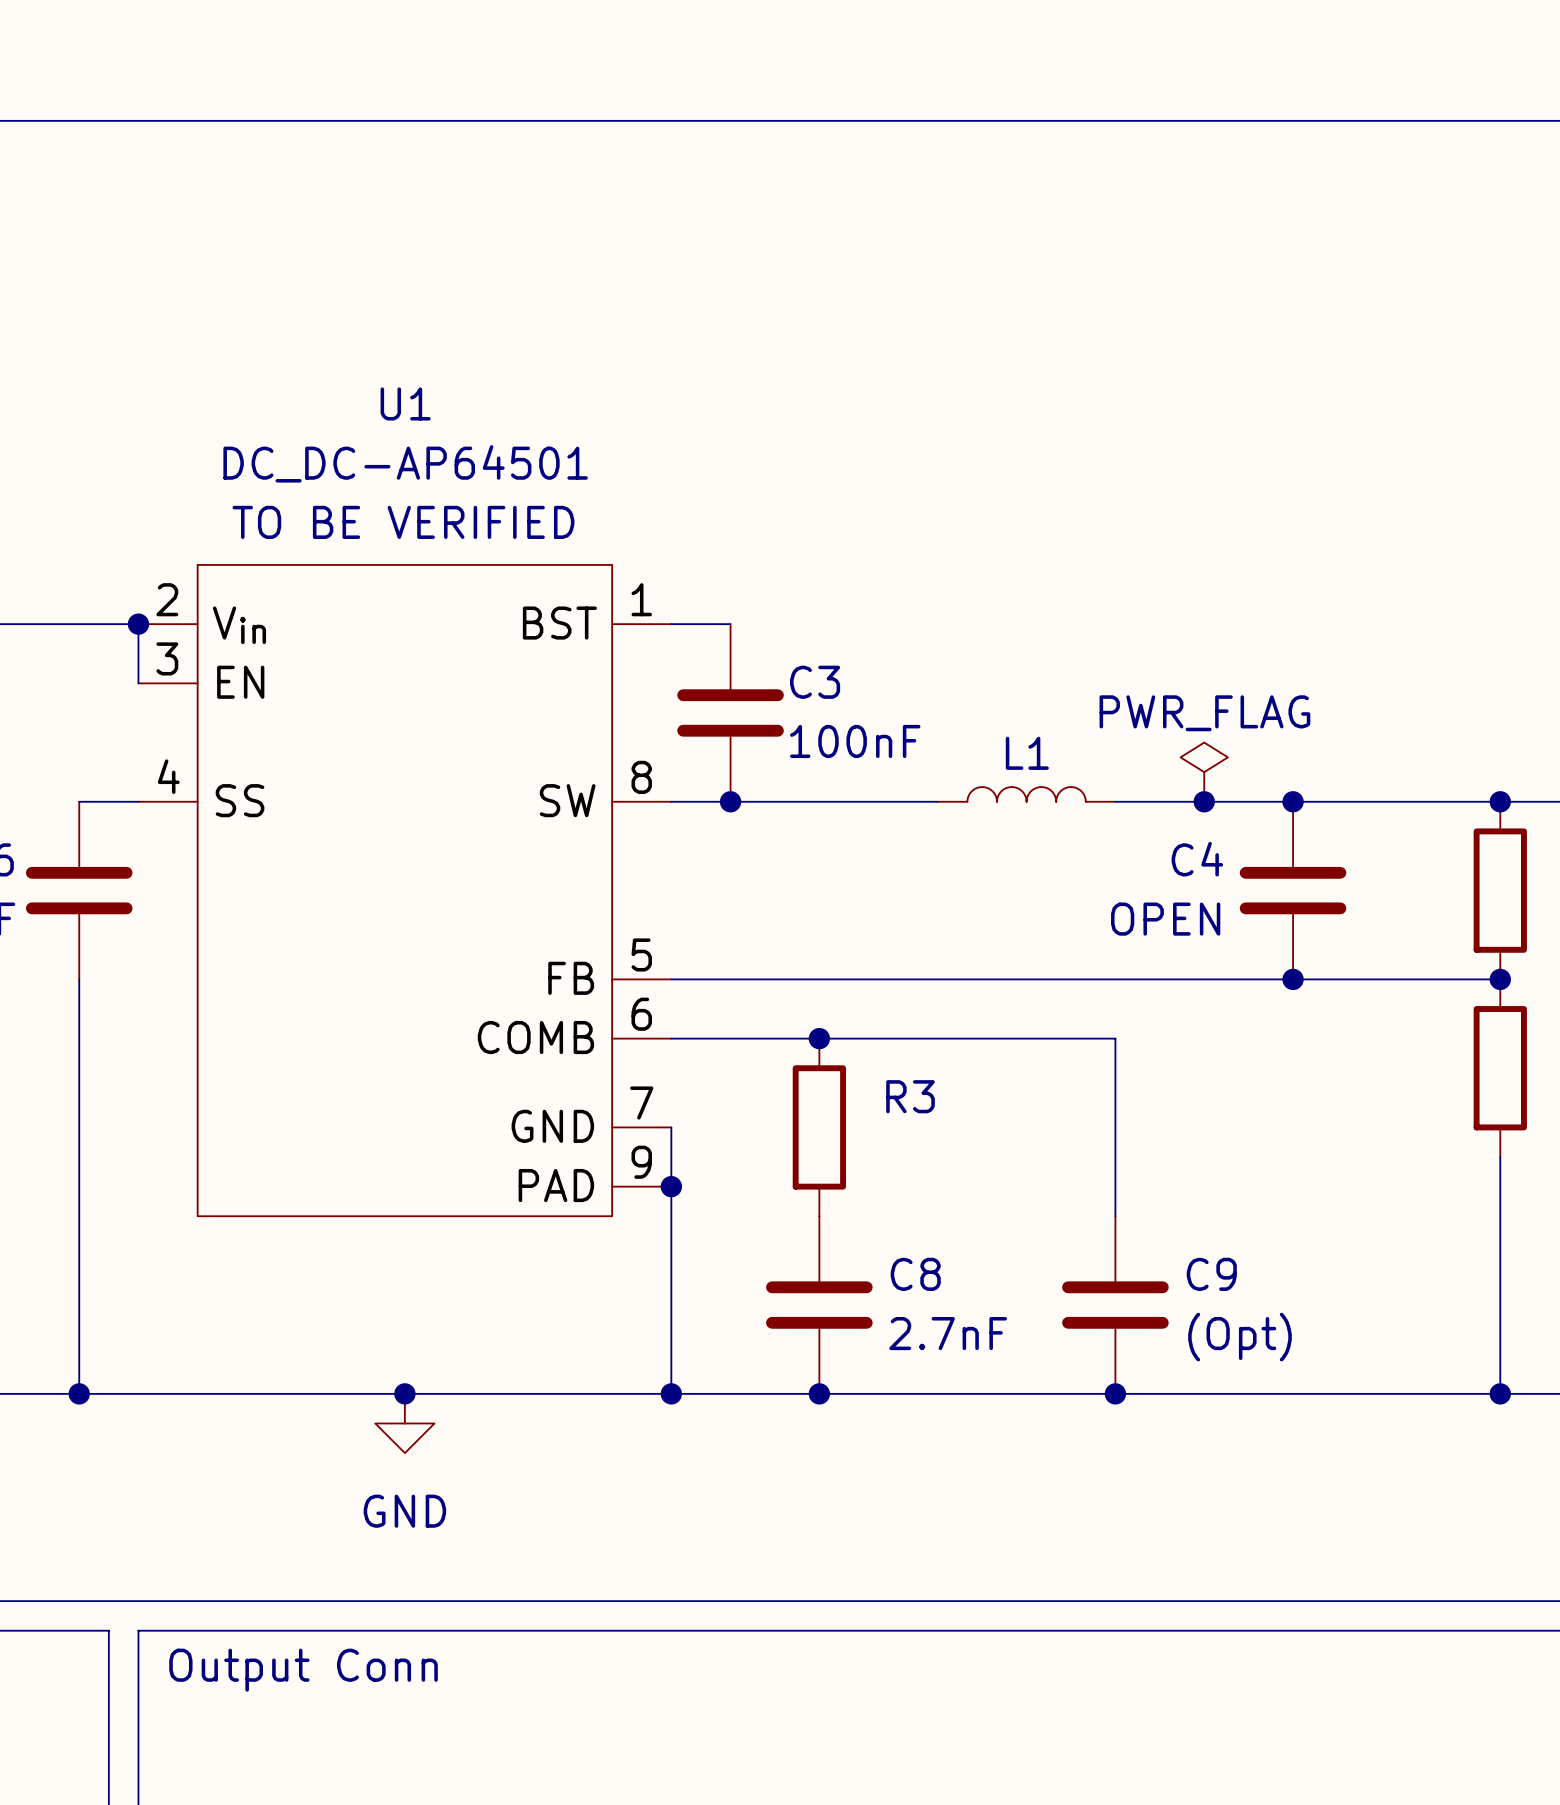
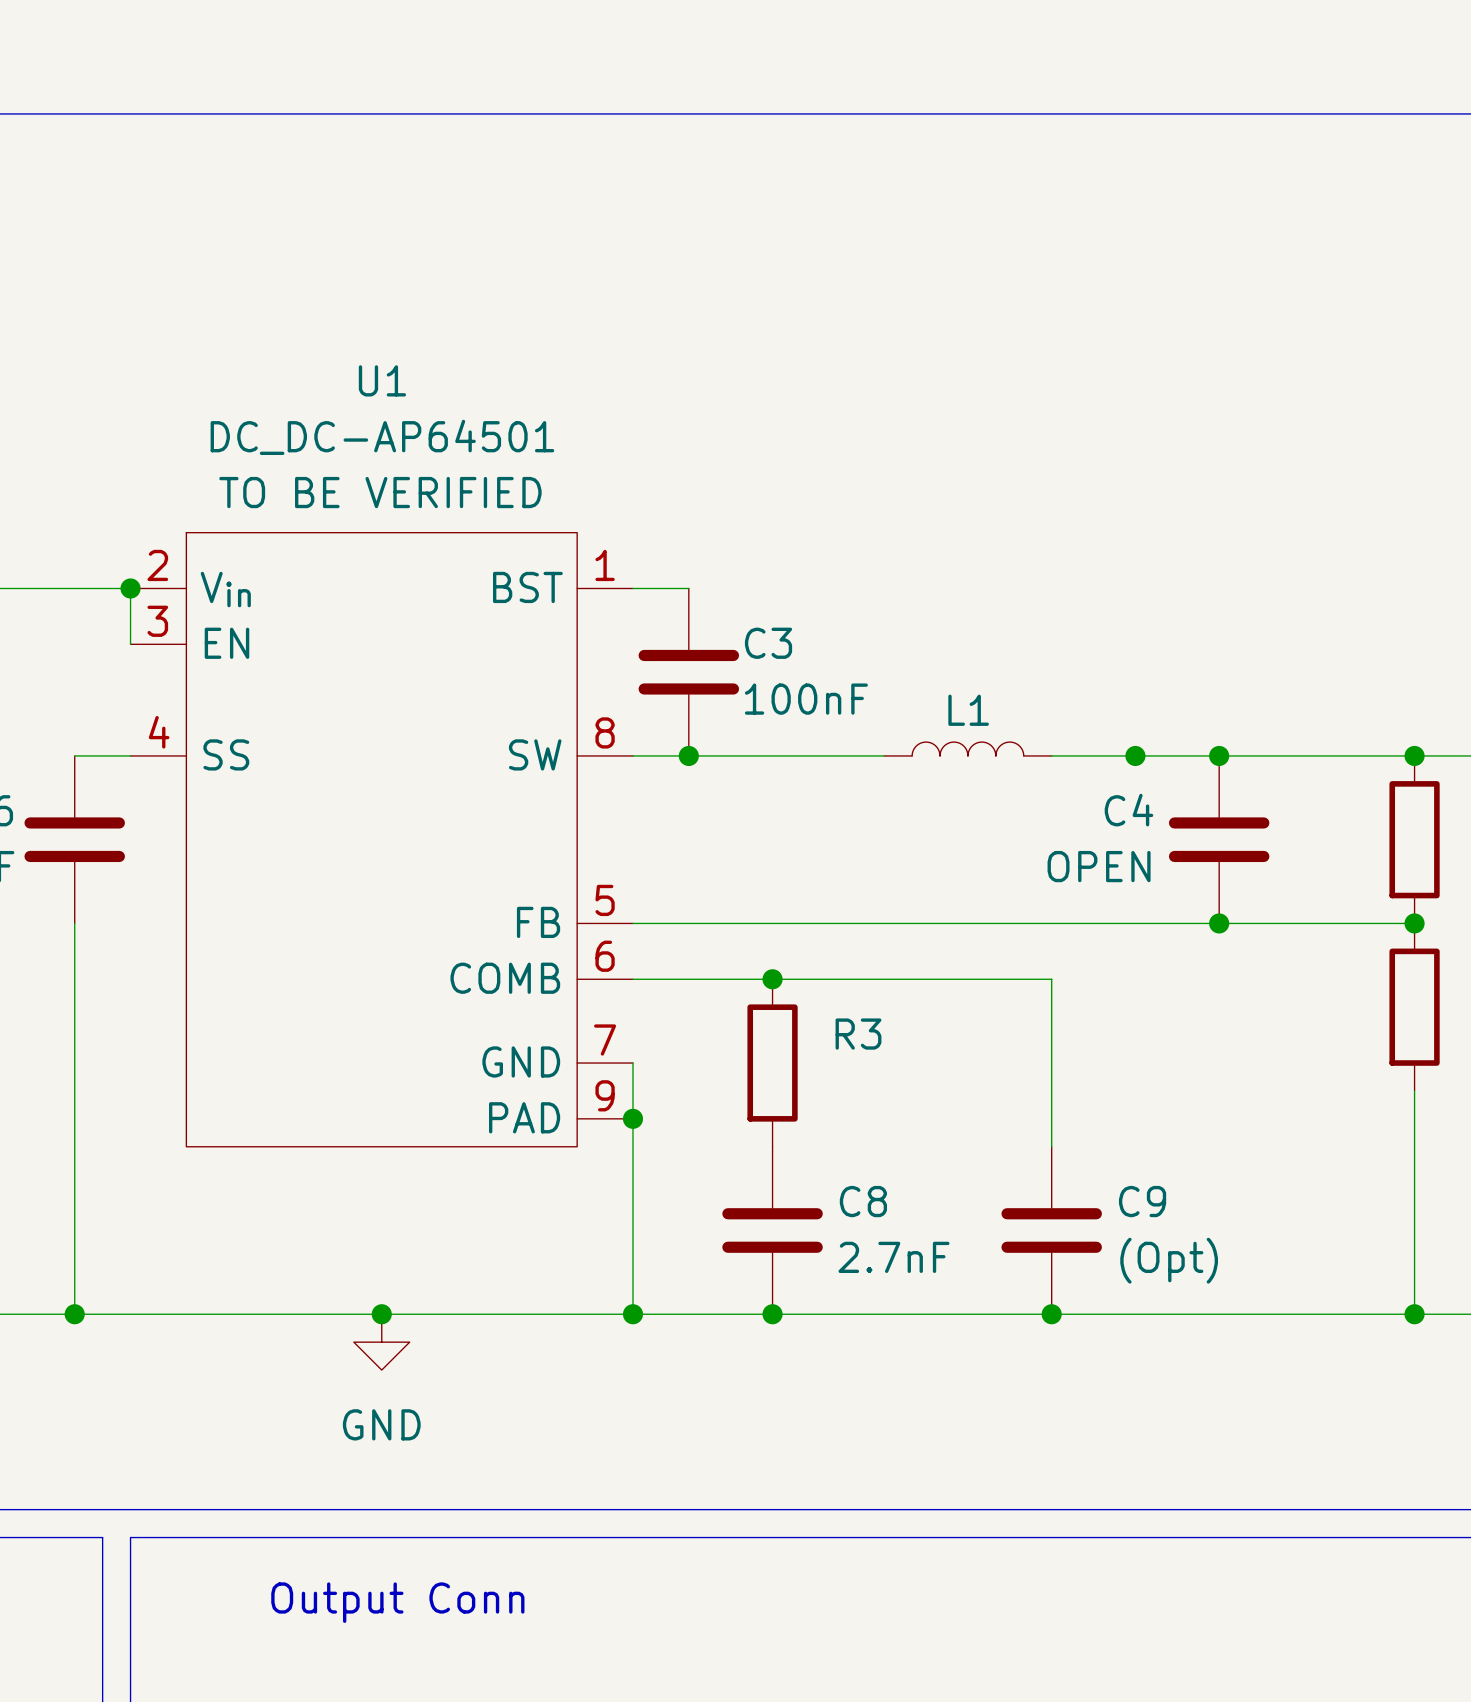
power symbol: PWR_FLAG (1204, 772) -> none
text position: Output Conn (303, 1670) -> Output Conn (397, 1602)

